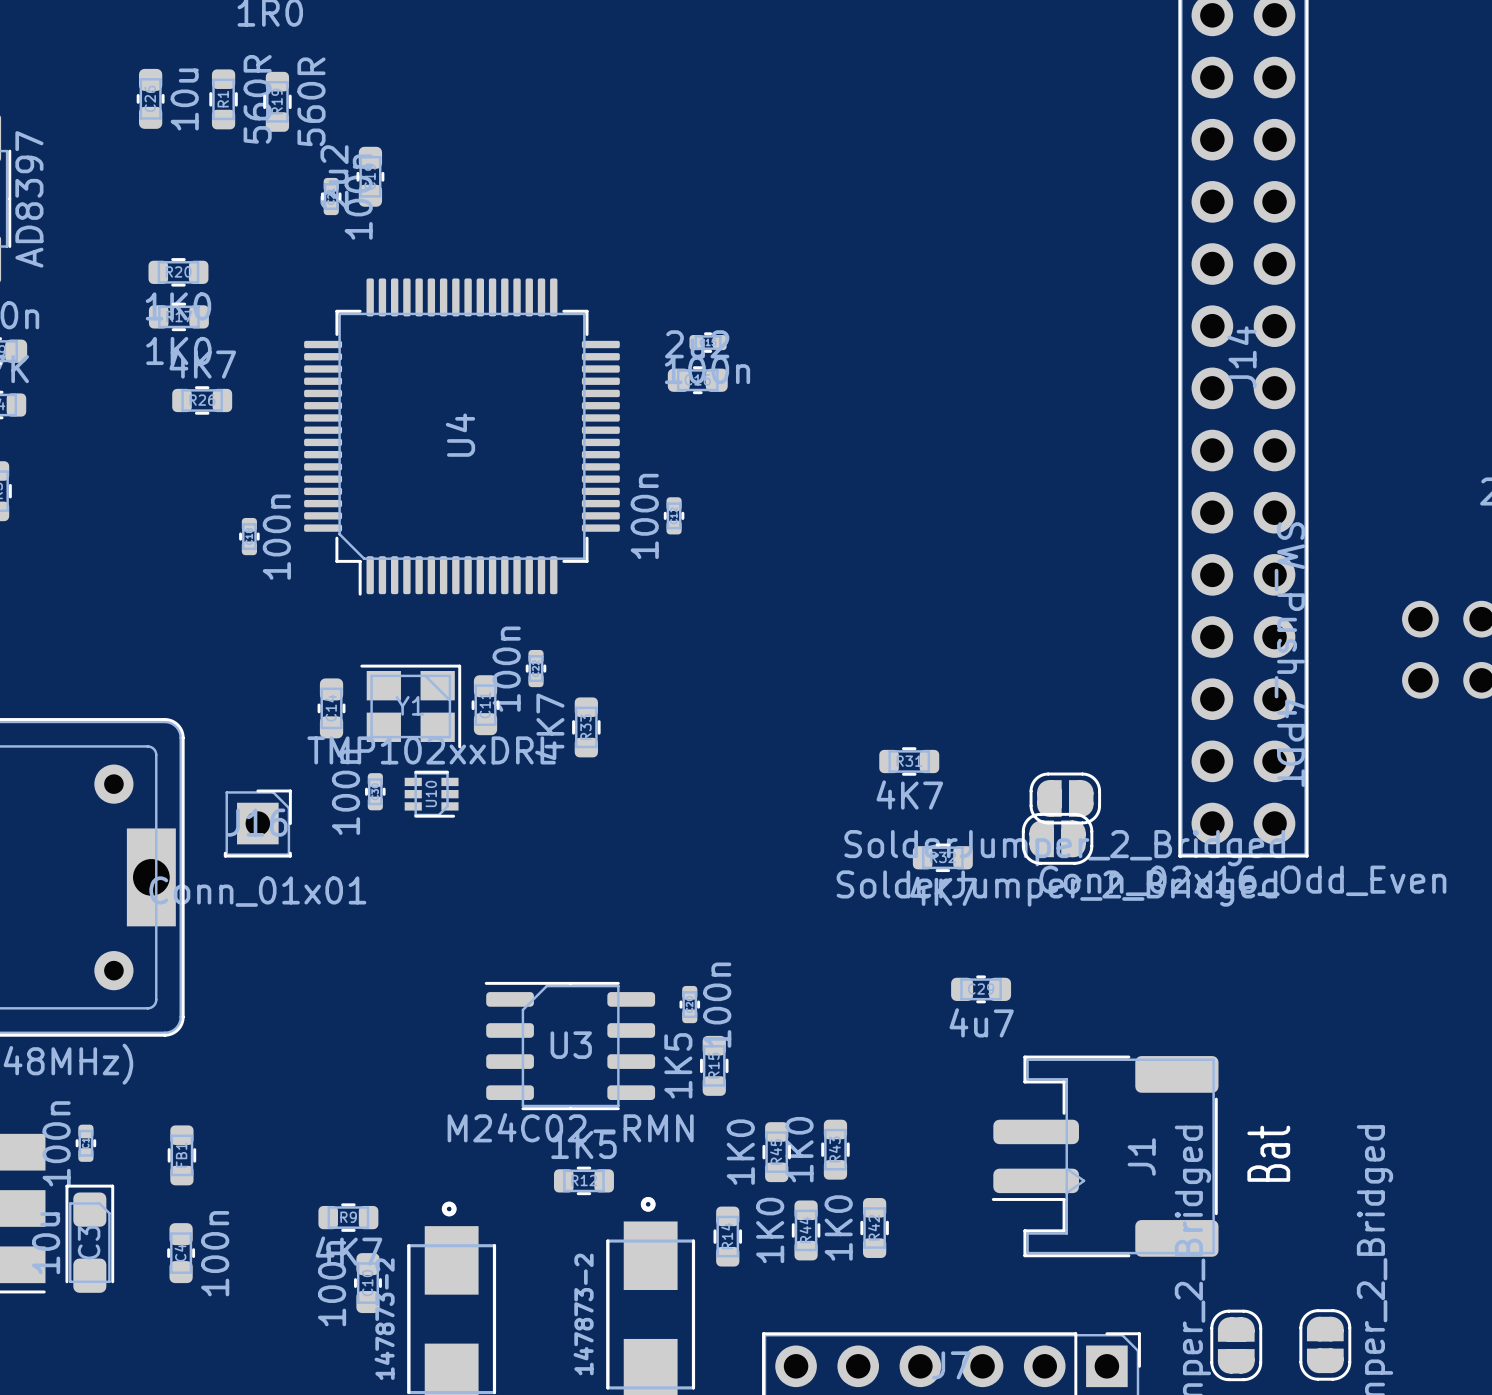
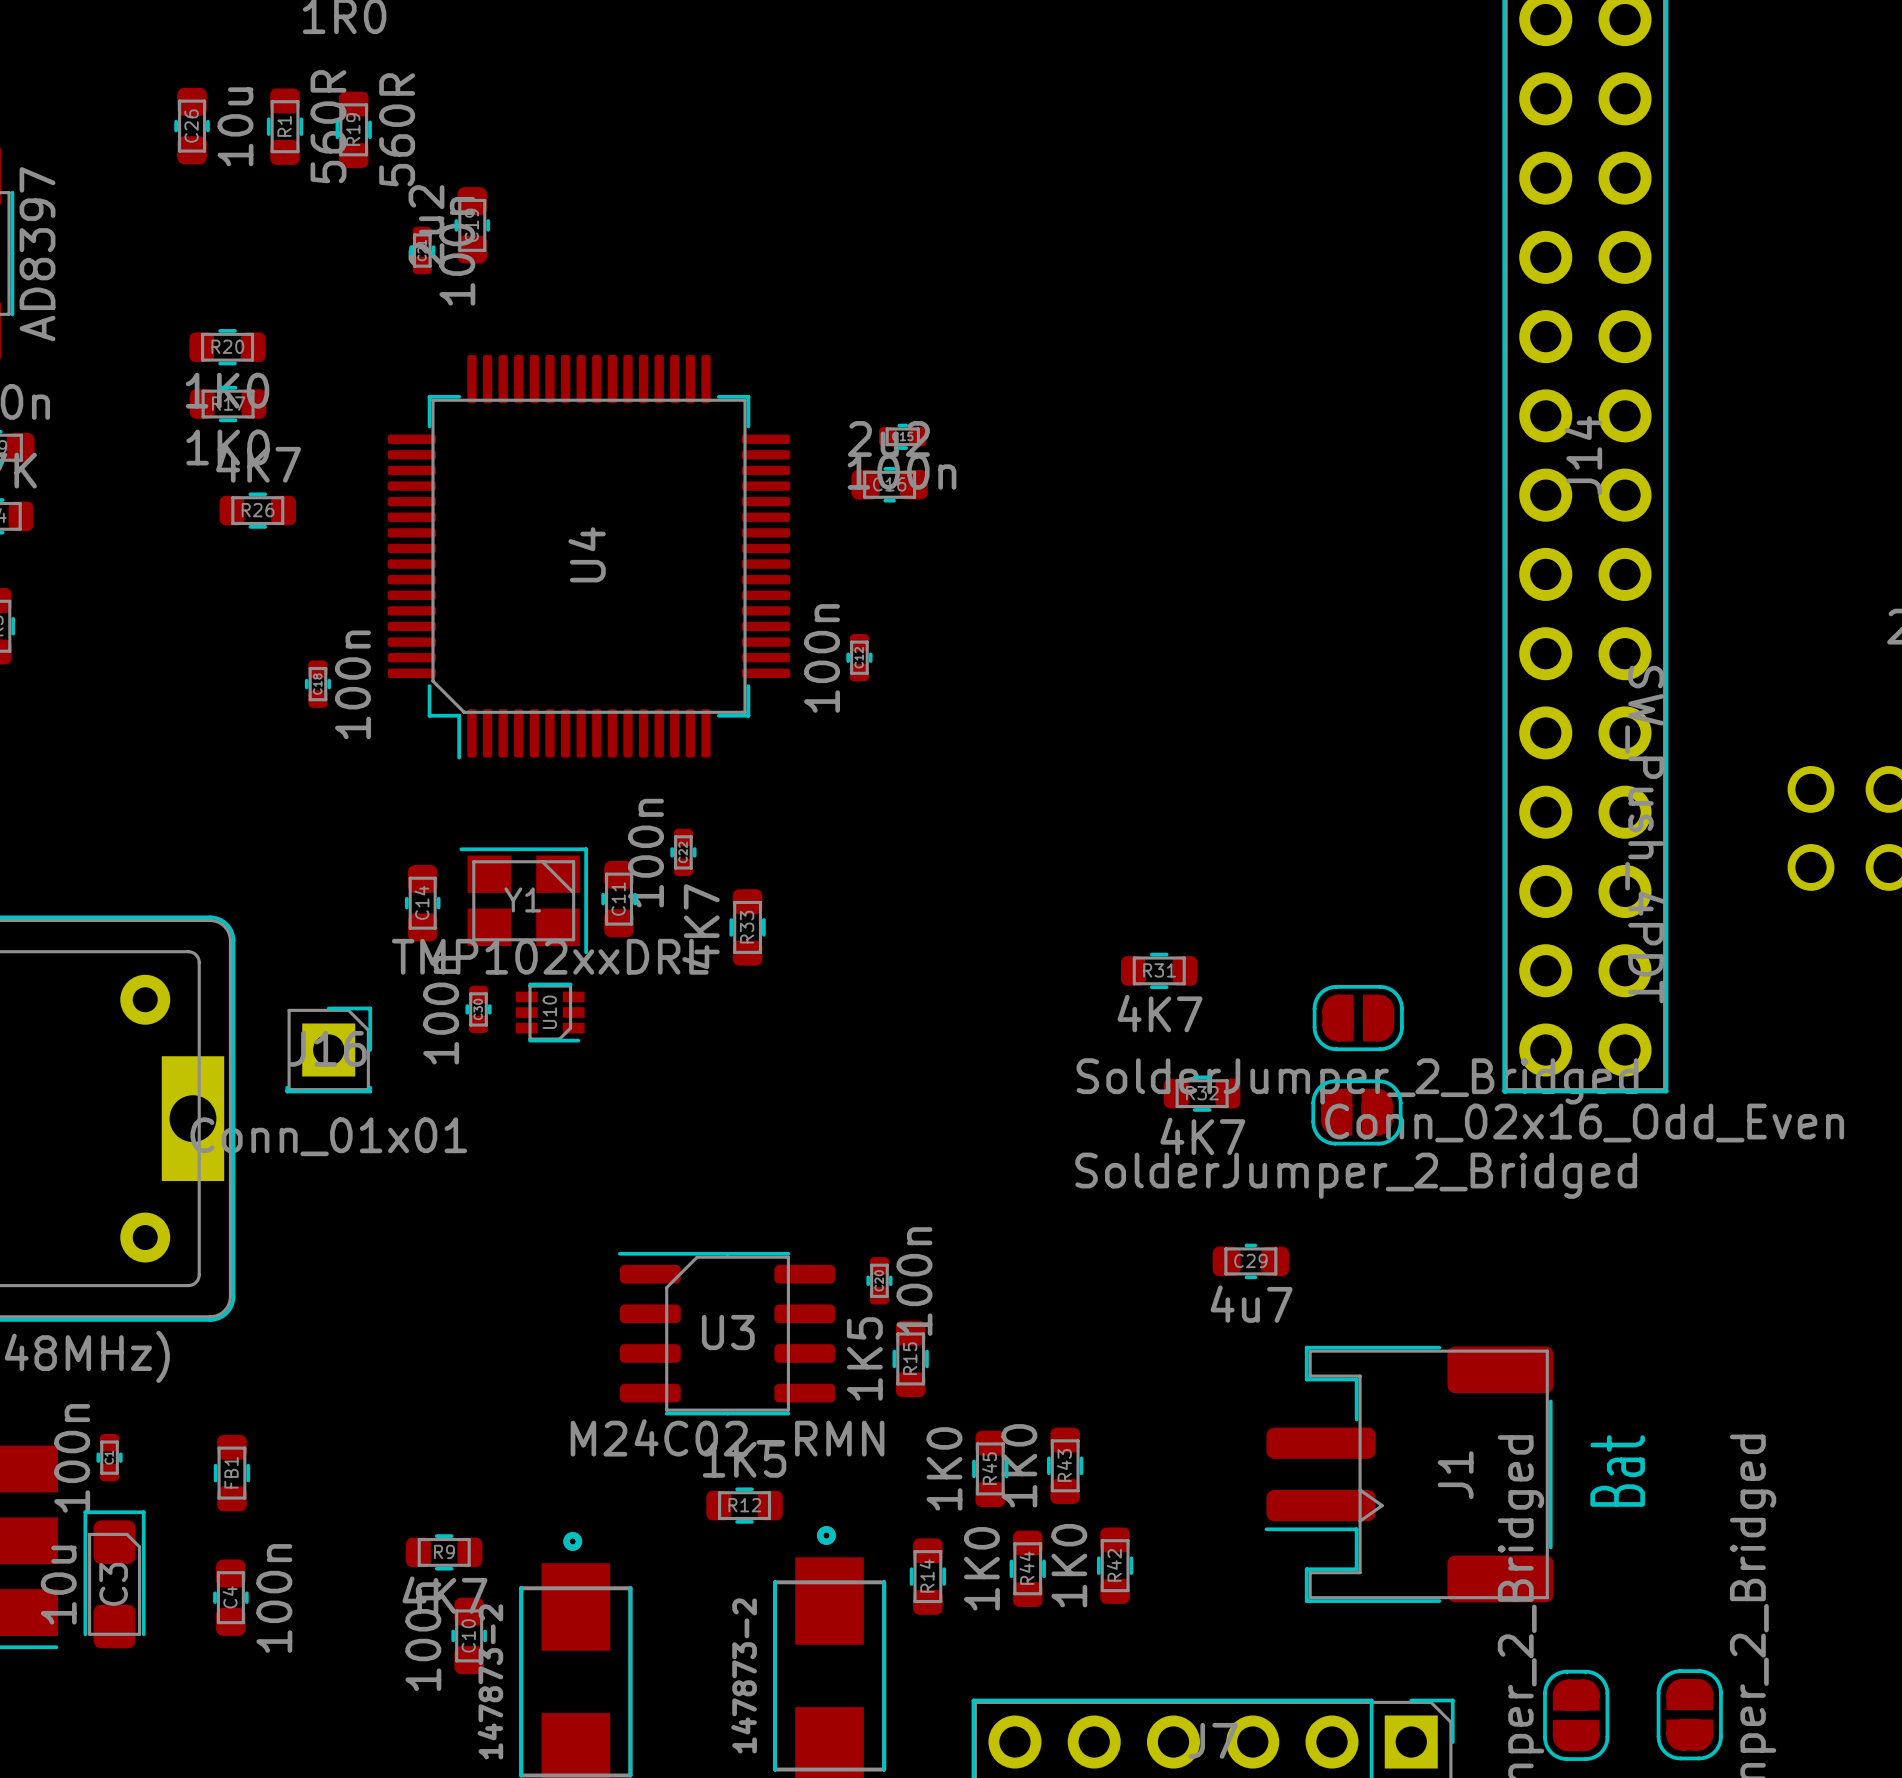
part position: (1057, 838) -> (1356, 1112)

